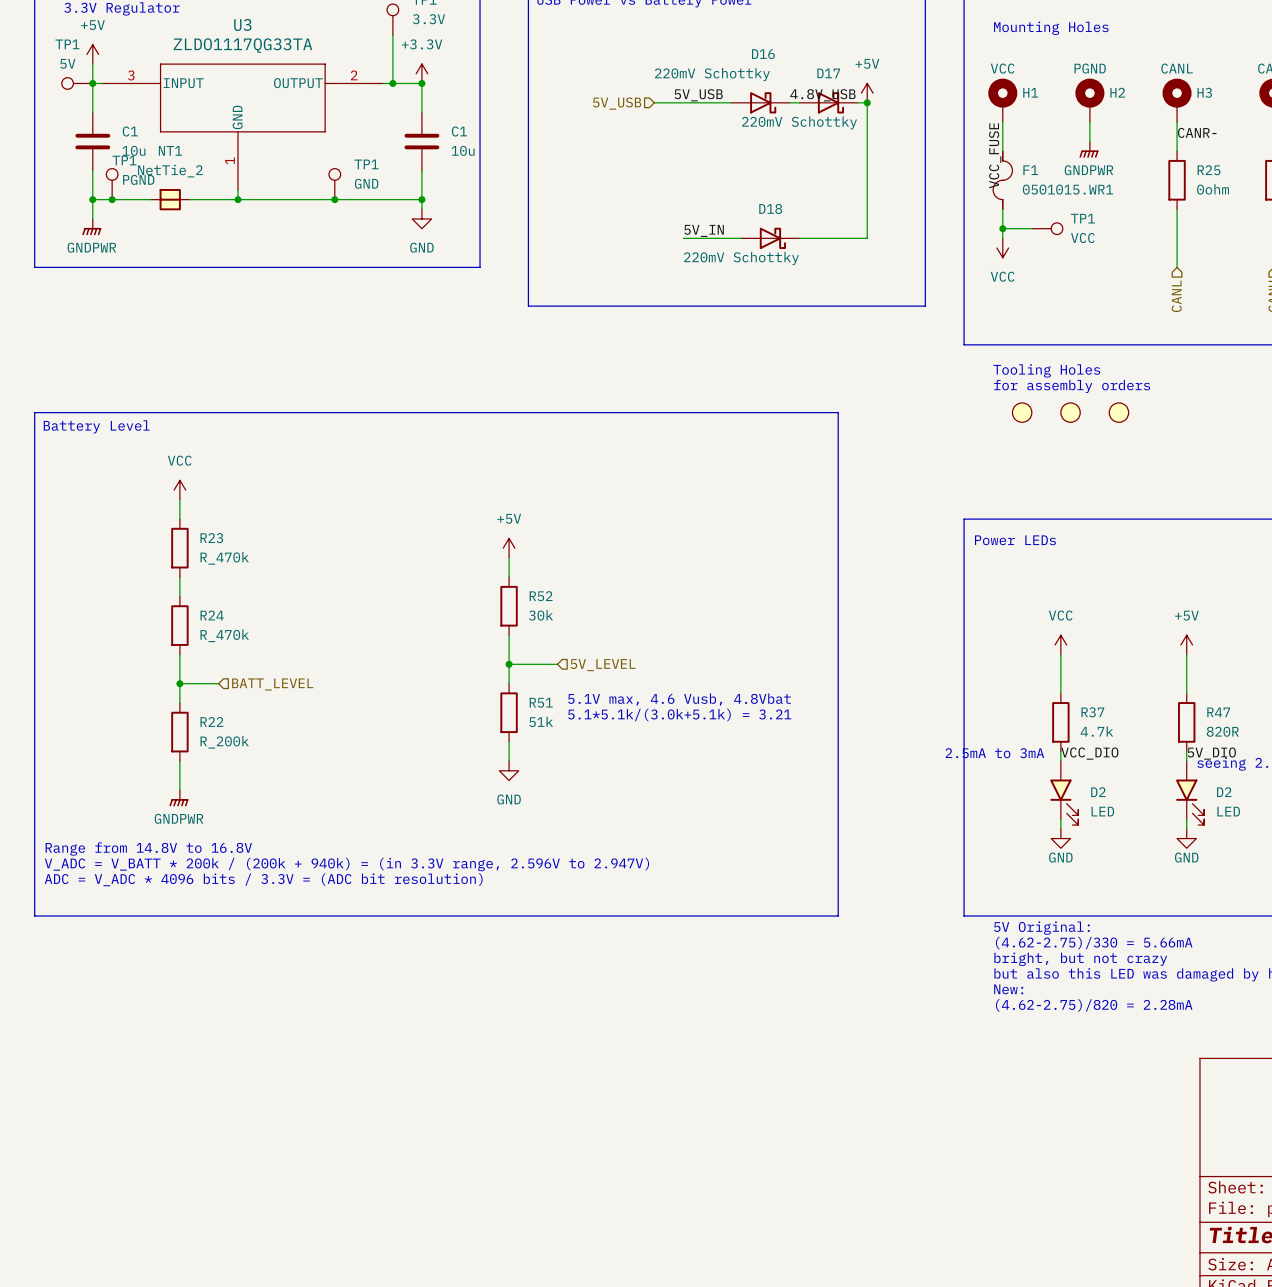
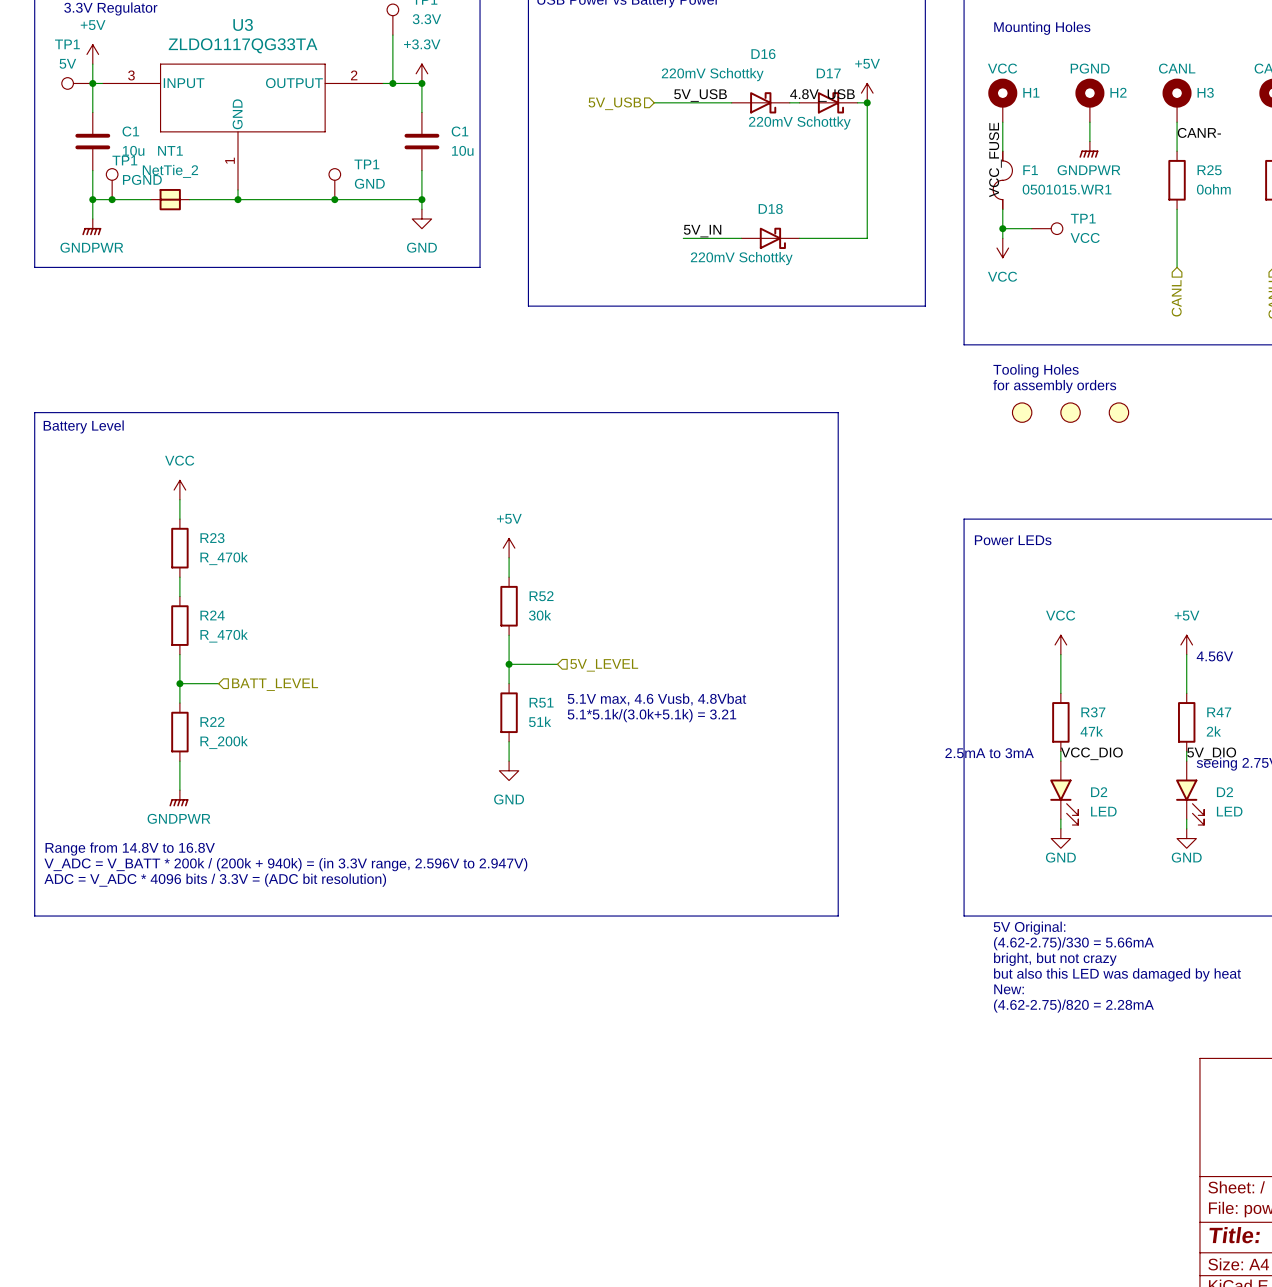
text: none -> 4.56V (1214, 656)
R37 value: 4.7k (1096, 731) -> 47k (1091, 731)
R47 value: 820R (1222, 731) -> 2k (1213, 731)

